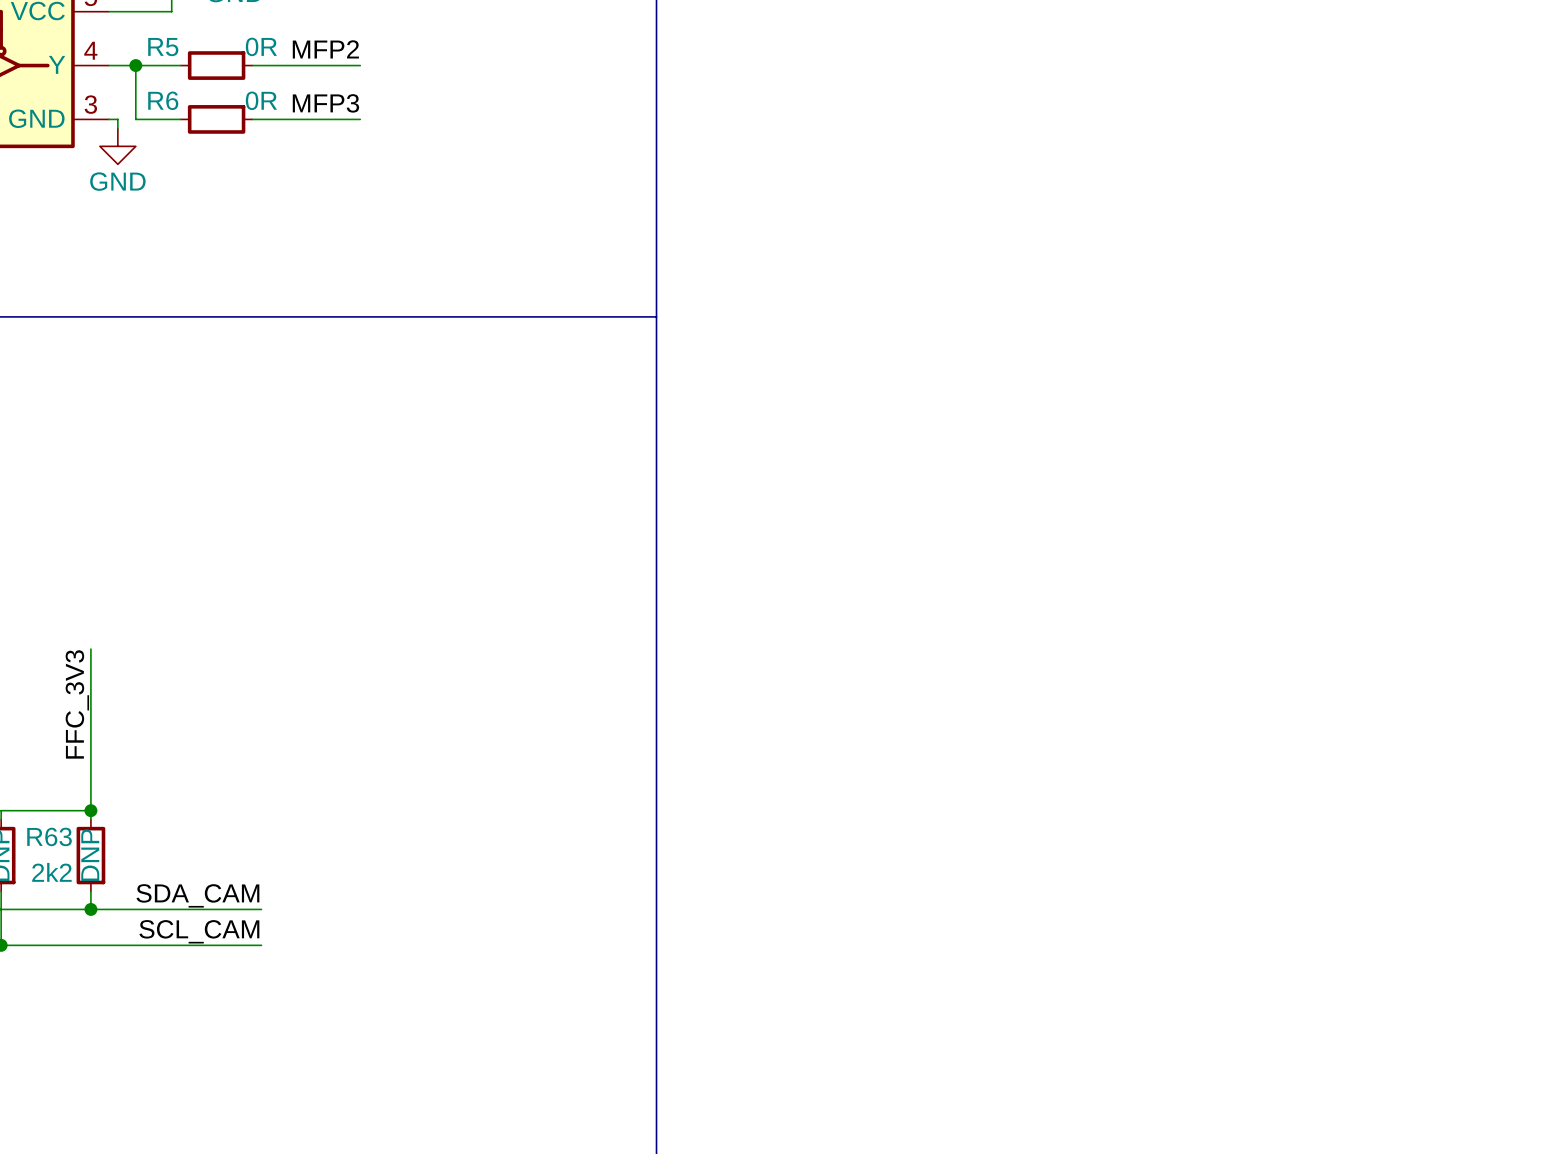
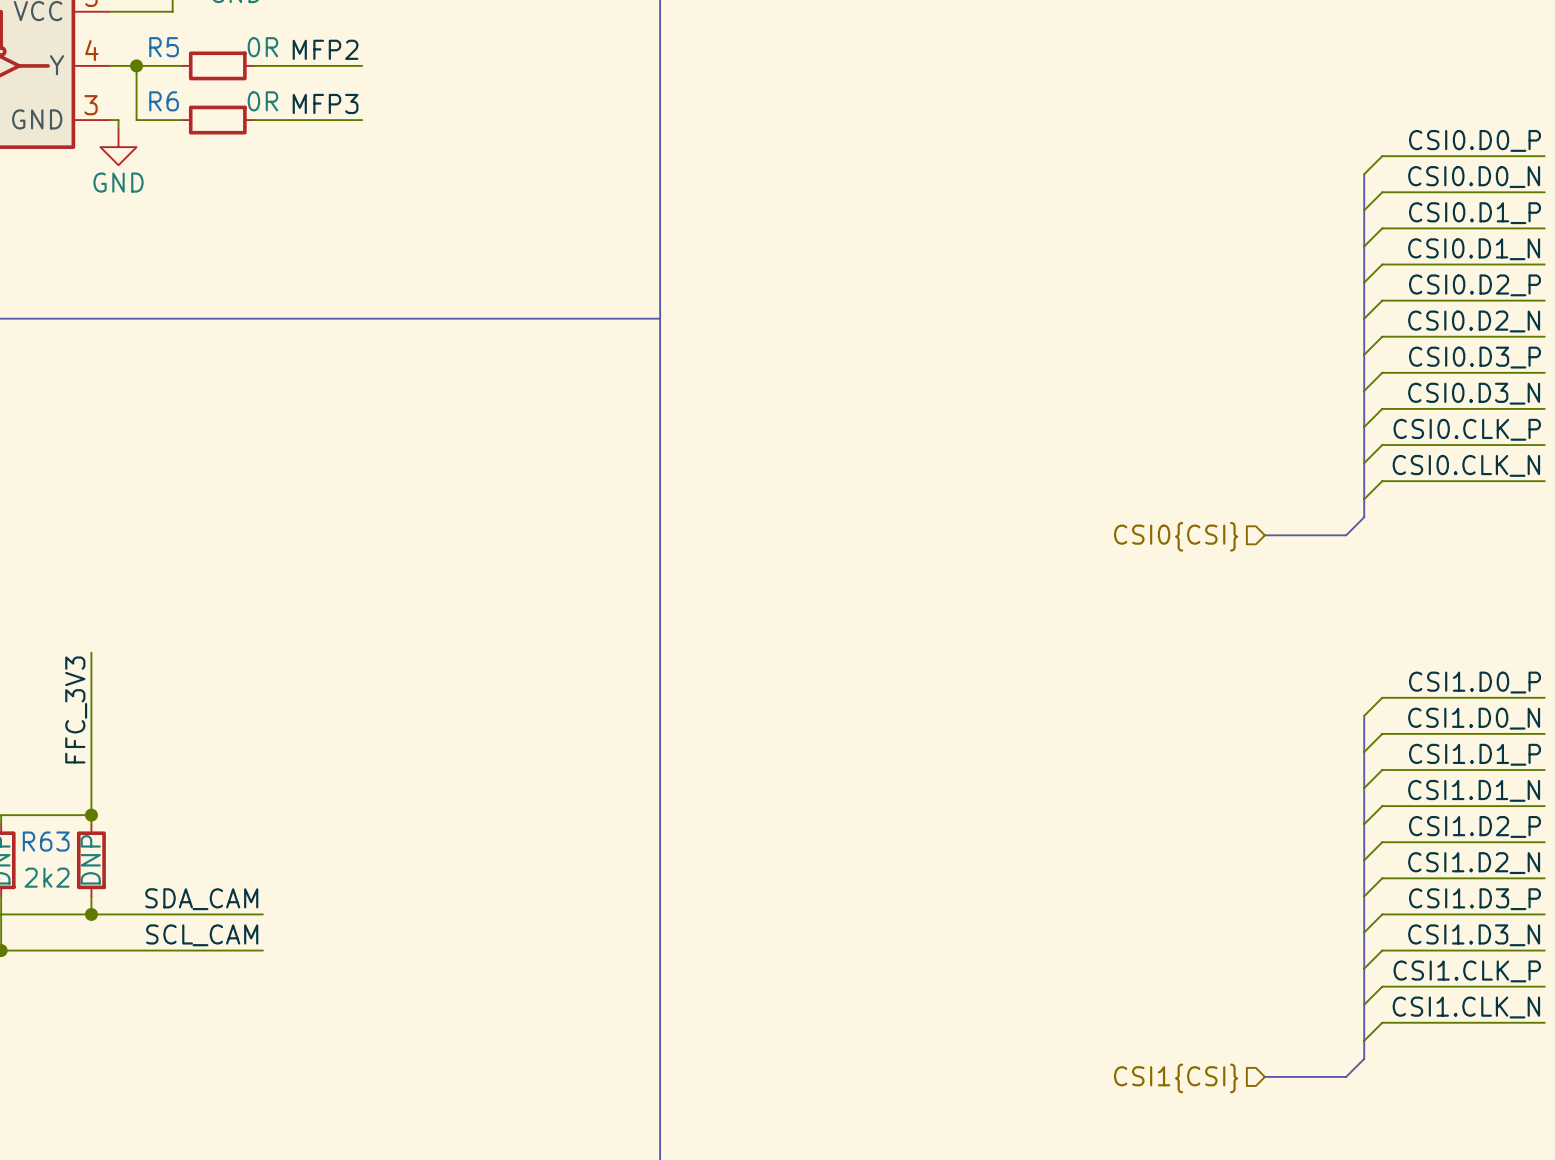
label: none -> CSI0.D0_P (1474, 140)
wire: none -> (1544, 156) (1382, 156) (1364, 174)
bus: none -> (1364, 174) (1364, 517) (1346, 535) (1264, 535)
label: none -> CSI0.D0_N (1474, 177)
wire: none -> (1544, 192) (1382, 192) (1364, 210)
label: none -> CSI0.D1_P (1474, 213)
wire: none -> (1544, 228) (1382, 228) (1364, 246)
label: none -> CSI0.D1_N (1474, 249)
wire: none -> (1544, 264) (1382, 264) (1364, 282)
label: none -> CSI0.D2_P (1474, 285)
wire: none -> (1544, 300) (1382, 300) (1364, 318)
label: none -> CSI0.D2_N (1474, 321)
wire: none -> (1544, 336) (1382, 336) (1364, 354)
label: none -> CSI0.D3_P (1474, 357)
wire: none -> (1544, 372) (1382, 372) (1364, 390)
label: none -> CSI0.D3_N (1474, 393)
wire: none -> (1544, 408) (1382, 408) (1364, 426)
label: none -> CSI0.CLK_P (1467, 429)
wire: none -> (1544, 445) (1382, 445) (1364, 463)
label: none -> CSI0.CLK_N (1466, 465)
wire: none -> (1544, 481) (1382, 481) (1364, 499)
hierarchical label: none -> CSI0{CSI} (1176, 536)
label: none -> CSI1.D0_P (1474, 682)
wire: none -> (1544, 697) (1382, 697) (1364, 715)
bus: none -> (1364, 715) (1364, 1058) (1346, 1076) (1264, 1076)
label: none -> CSI1.D0_N (1474, 718)
wire: none -> (1544, 733) (1382, 733) (1364, 751)
label: none -> CSI1.D1_P (1474, 754)
wire: none -> (1544, 770) (1382, 770) (1364, 788)
label: none -> CSI1.D1_N (1474, 790)
wire: none -> (1544, 806) (1382, 806) (1364, 824)
label: none -> CSI1.D2_P (1474, 826)
wire: none -> (1544, 842) (1382, 842) (1364, 860)
label: none -> CSI1.D2_N (1474, 863)
wire: none -> (1544, 878) (1382, 878) (1364, 896)
label: none -> CSI1.D3_P (1474, 899)
wire: none -> (1544, 914) (1382, 914) (1364, 932)
label: none -> CSI1.D3_N (1474, 935)
wire: none -> (1544, 950) (1382, 950) (1364, 968)
label: none -> CSI1.CLK_P (1467, 971)
wire: none -> (1544, 986) (1382, 986) (1364, 1004)
label: none -> CSI1.CLK_N (1466, 1007)
wire: none -> (1544, 1022) (1382, 1022) (1364, 1040)
hierarchical label: none -> CSI1{CSI} (1176, 1078)

